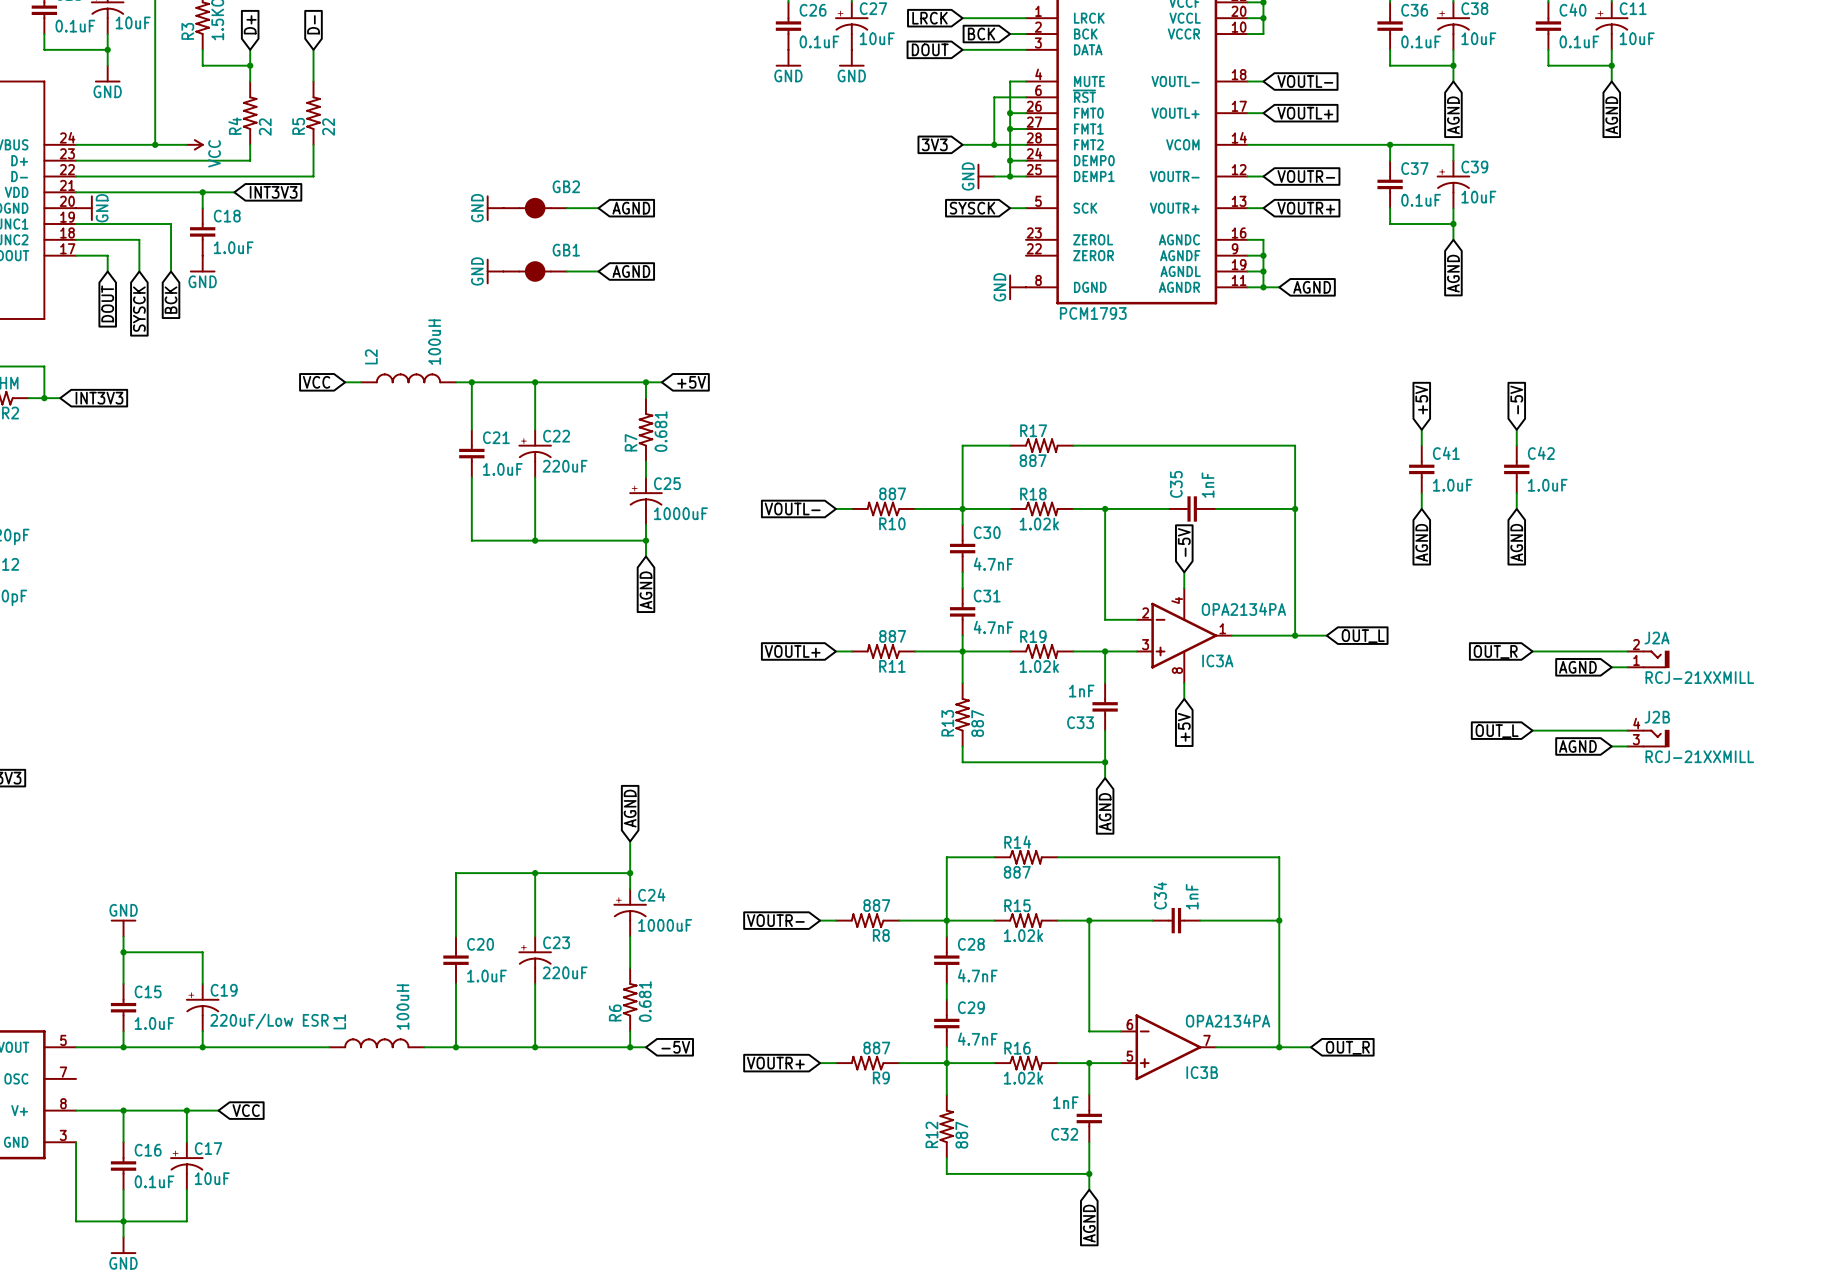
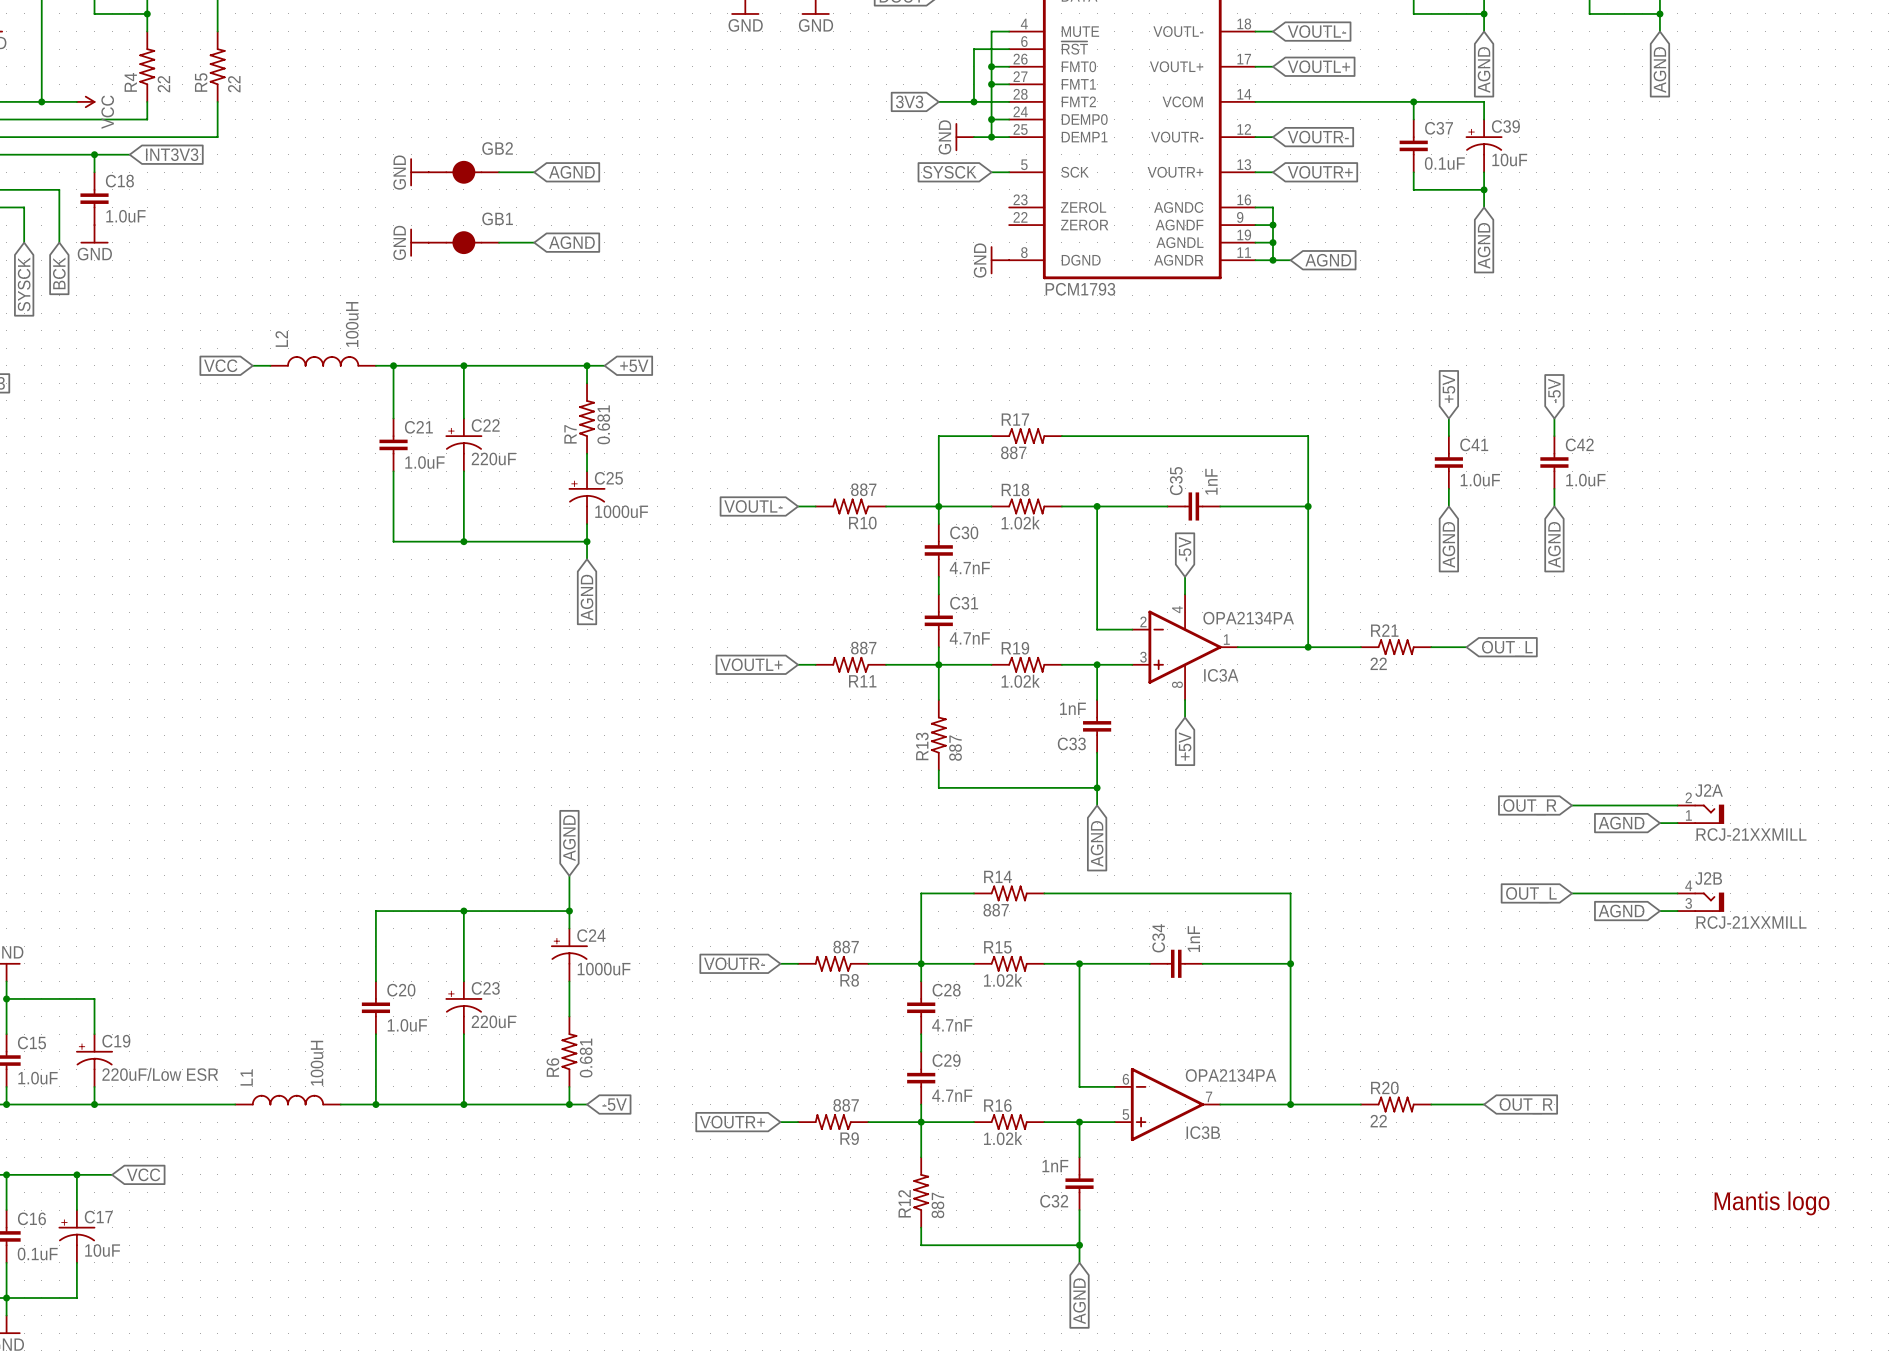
wire: none -> (1343, 647) (1360, 647)
R21: none -> 22 (1396, 647)
wire: none -> (1431, 647) (1466, 647)
global label: OUT_L (1363, 636) -> none
global label: none -> OUT_L (1507, 648)
wire: (1532, 651) (1627, 651) -> (1572, 805) (1677, 805)
global label position: OUT_R (1495, 652) -> OUT_R (1529, 807)
J2A position: (1648, 659) -> (1700, 814)
global label: AGND (1577, 667) -> none
wire: (1611, 667) (1627, 667) -> (1659, 823) (1677, 823)
wire: (1532, 730) (1627, 730) -> (1572, 893) (1677, 893)
global label: OUT_L (1497, 731) -> none
J2B position: (1648, 738) -> (1700, 902)
global label position: AGND (1577, 746) -> AGND (1621, 823)
wire: (1611, 746) (1627, 746) -> (1659, 911) (1677, 911)
global label: none -> OUT_L (1531, 895)
global label: none -> AGND (1621, 911)
wire: none -> (1325, 1104) (1360, 1104)
global label position: OUT_R (1347, 1047) -> OUT_R (1526, 1106)
R20: none -> 22 (1396, 1104)
wire: none -> (1431, 1104) (1484, 1104)
part: none -> (1772, 1203)

